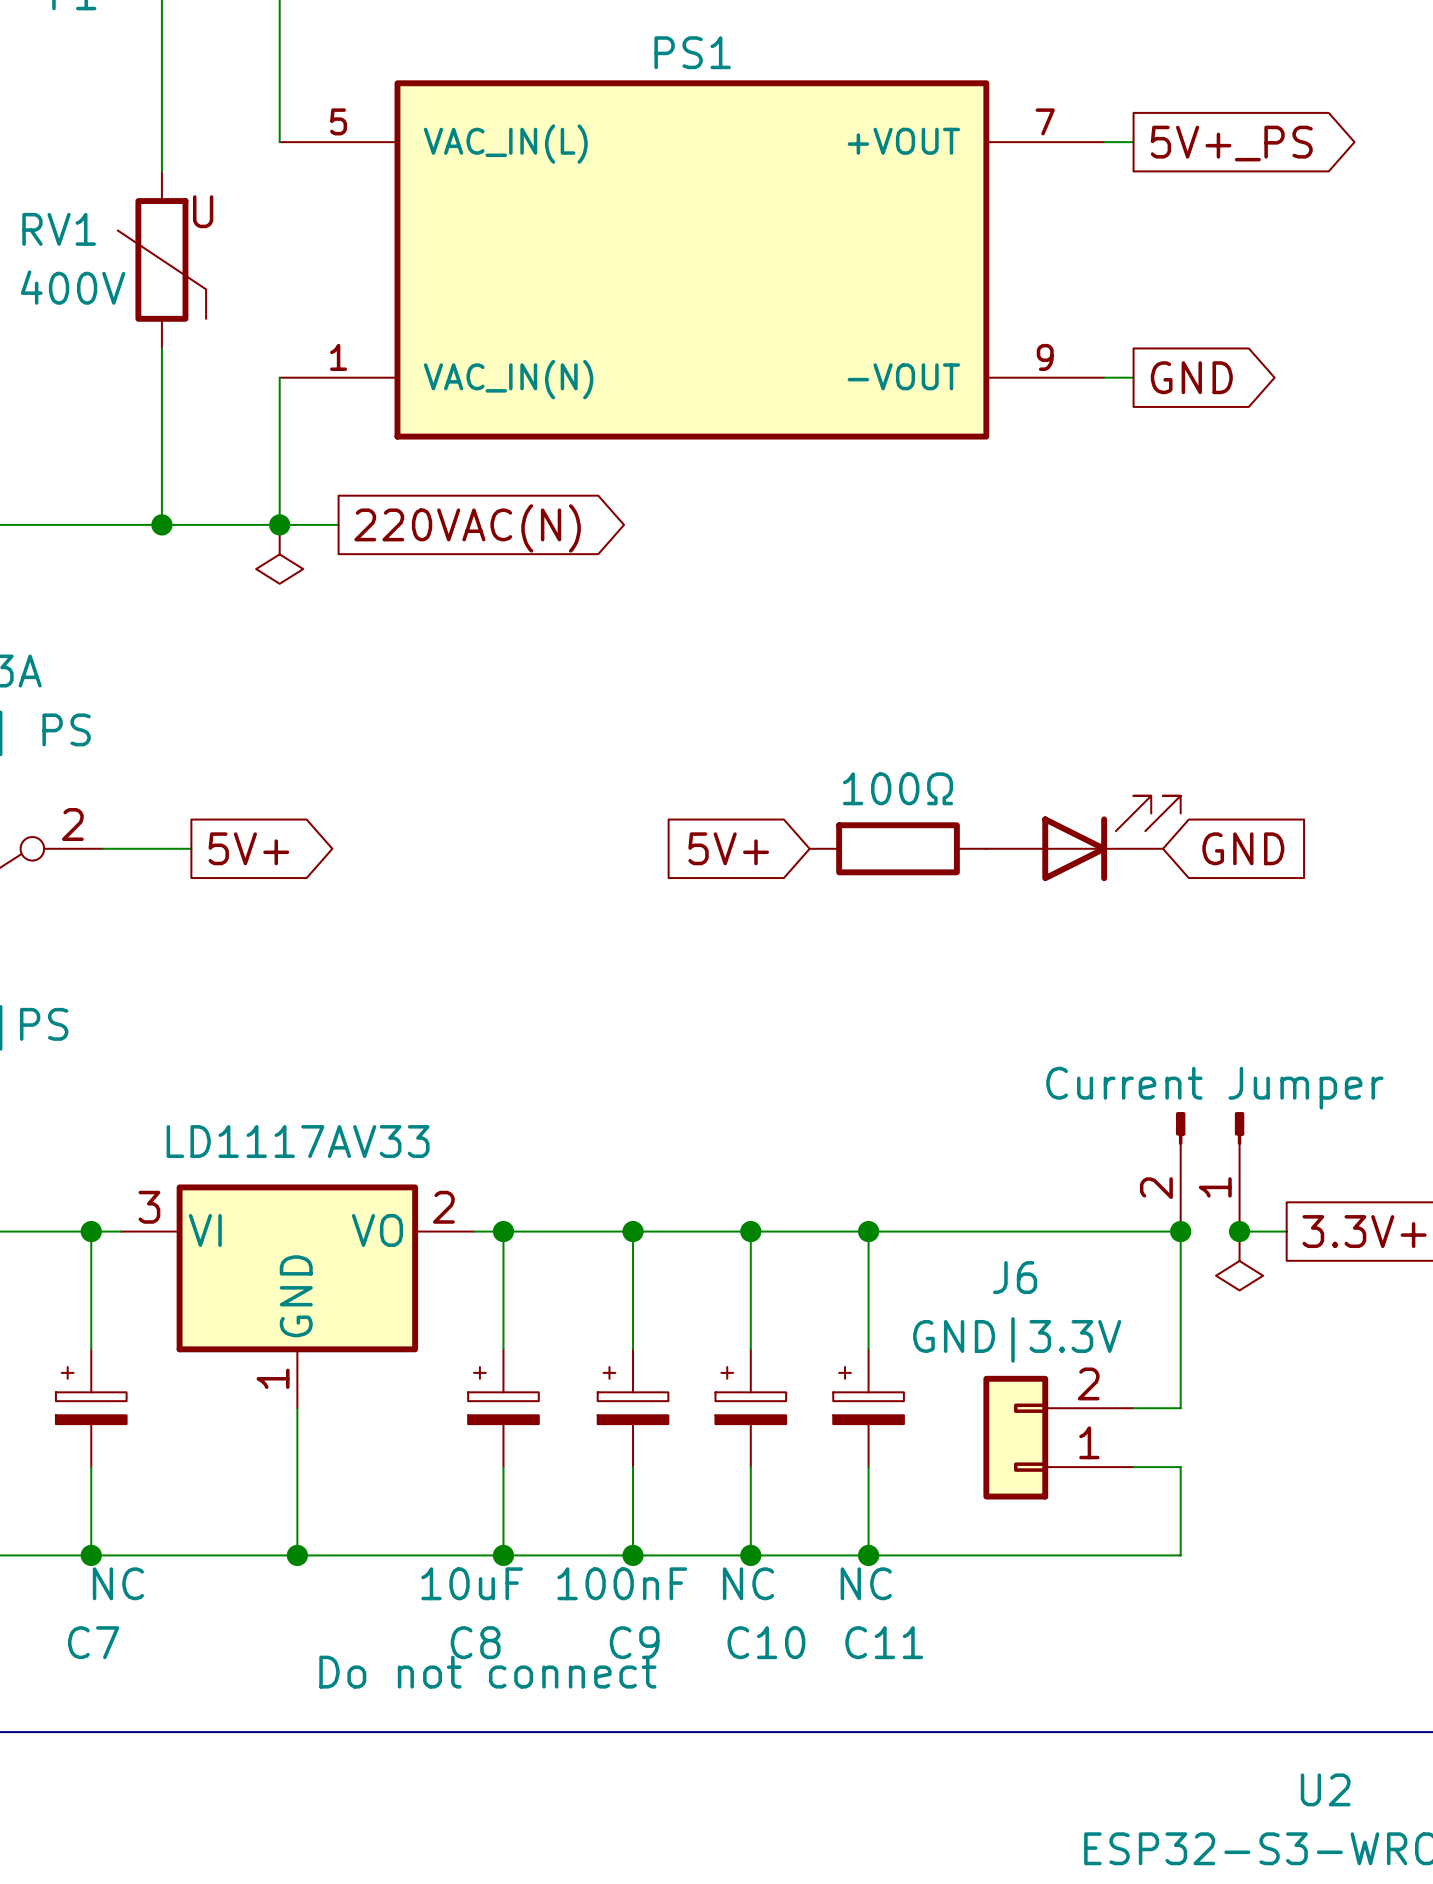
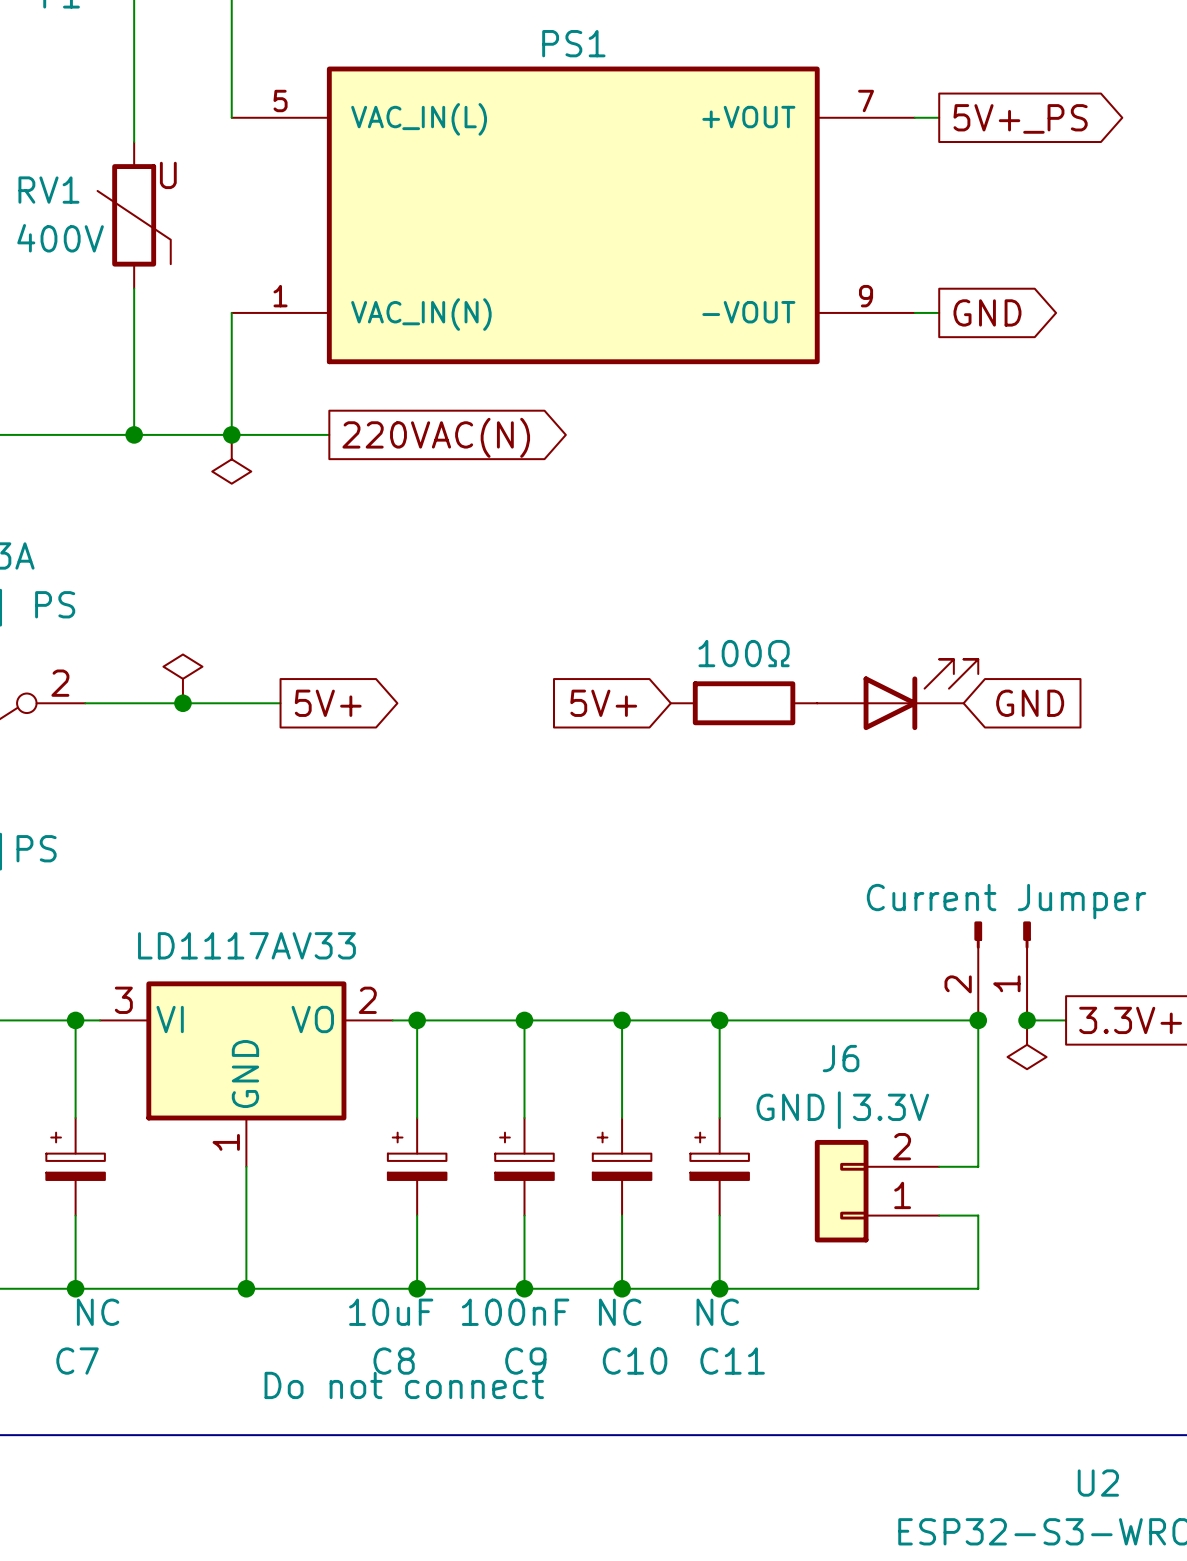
wire: none -> (280, 434) (329, 434)
global label position: 220VAC(N) (467, 528) -> 220VAC(N) (436, 437)
power symbol: none -> (182, 678)
wire: none -> (158, 703) (280, 703)
junction: none -> (182, 703)
global label position: 5V+ (248, 848) -> 5V+ (328, 703)

